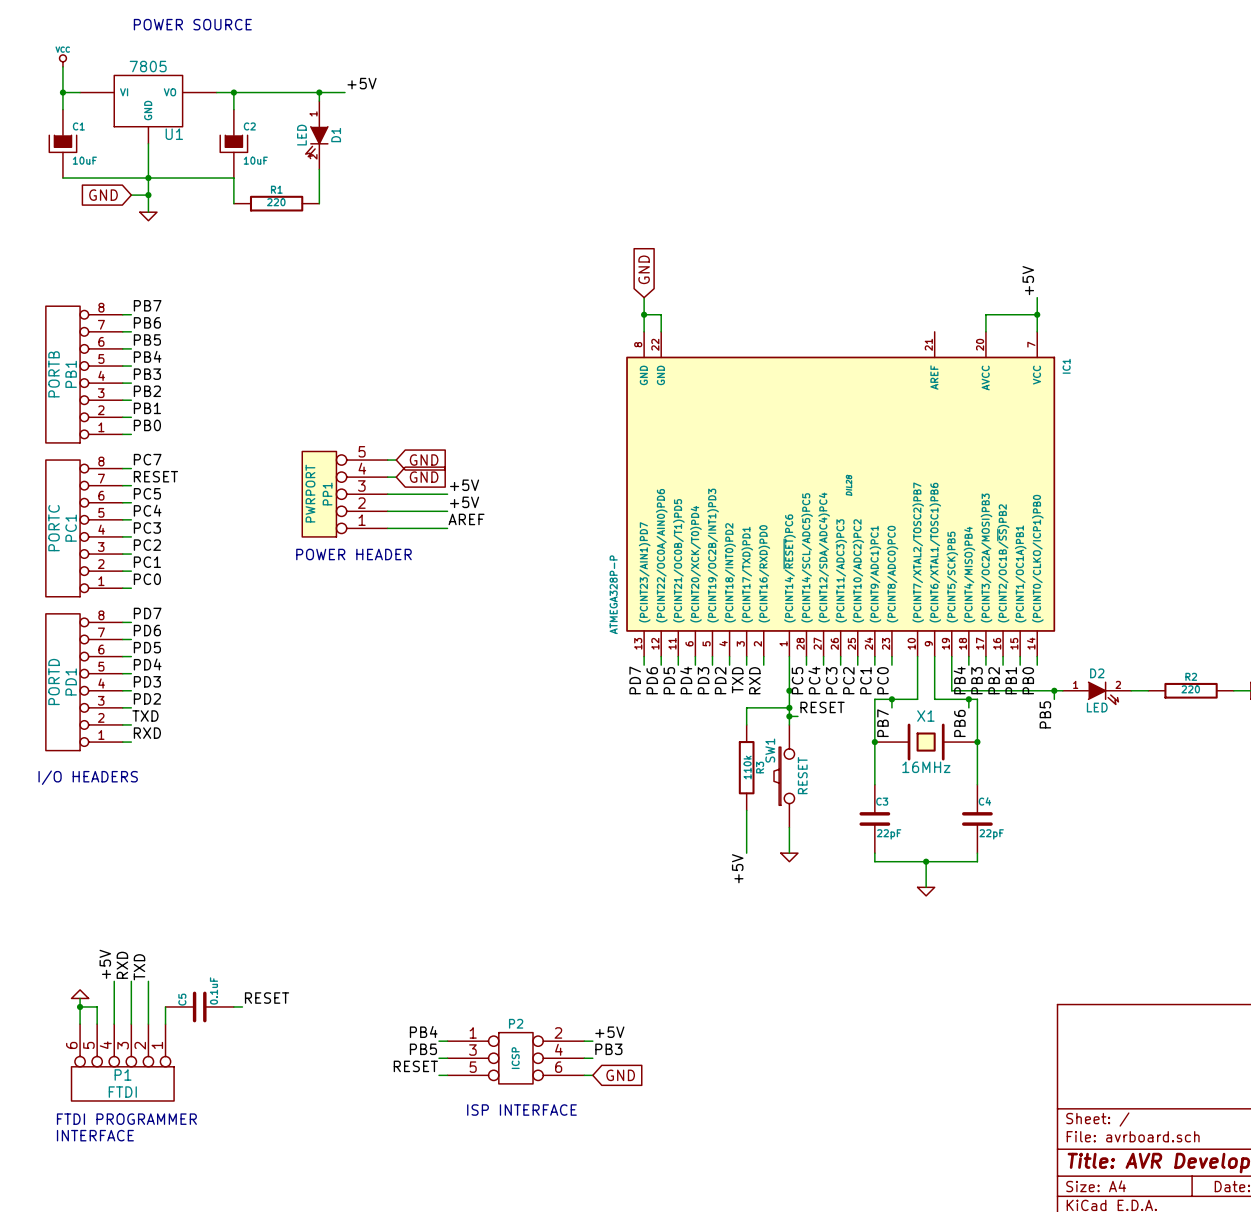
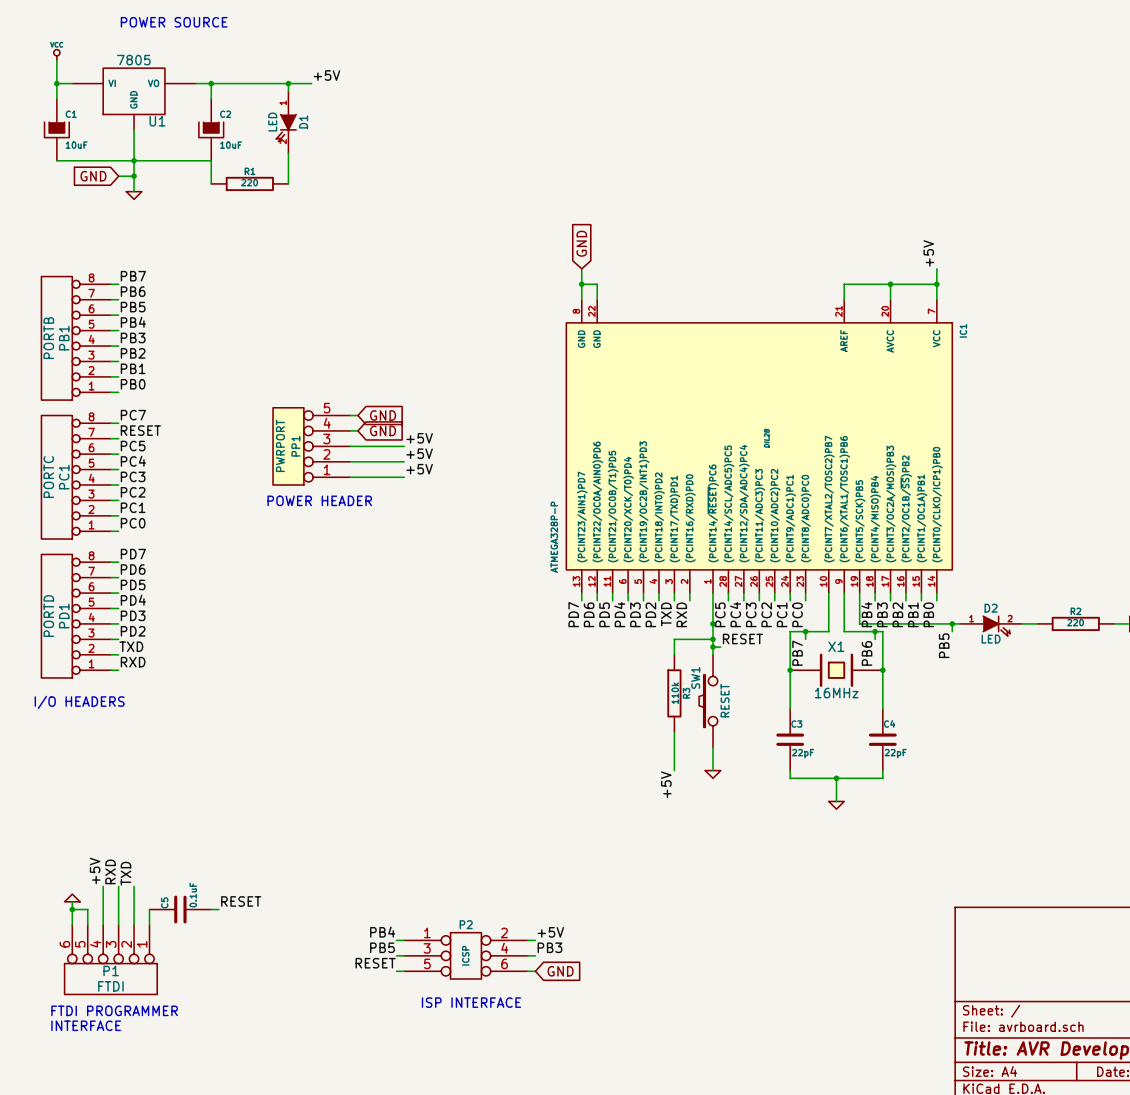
wire: none -> (890, 284) (844, 284) (844, 299)
junction: none -> (890, 284)
label: AREF (466, 519) -> +5V (419, 469)

